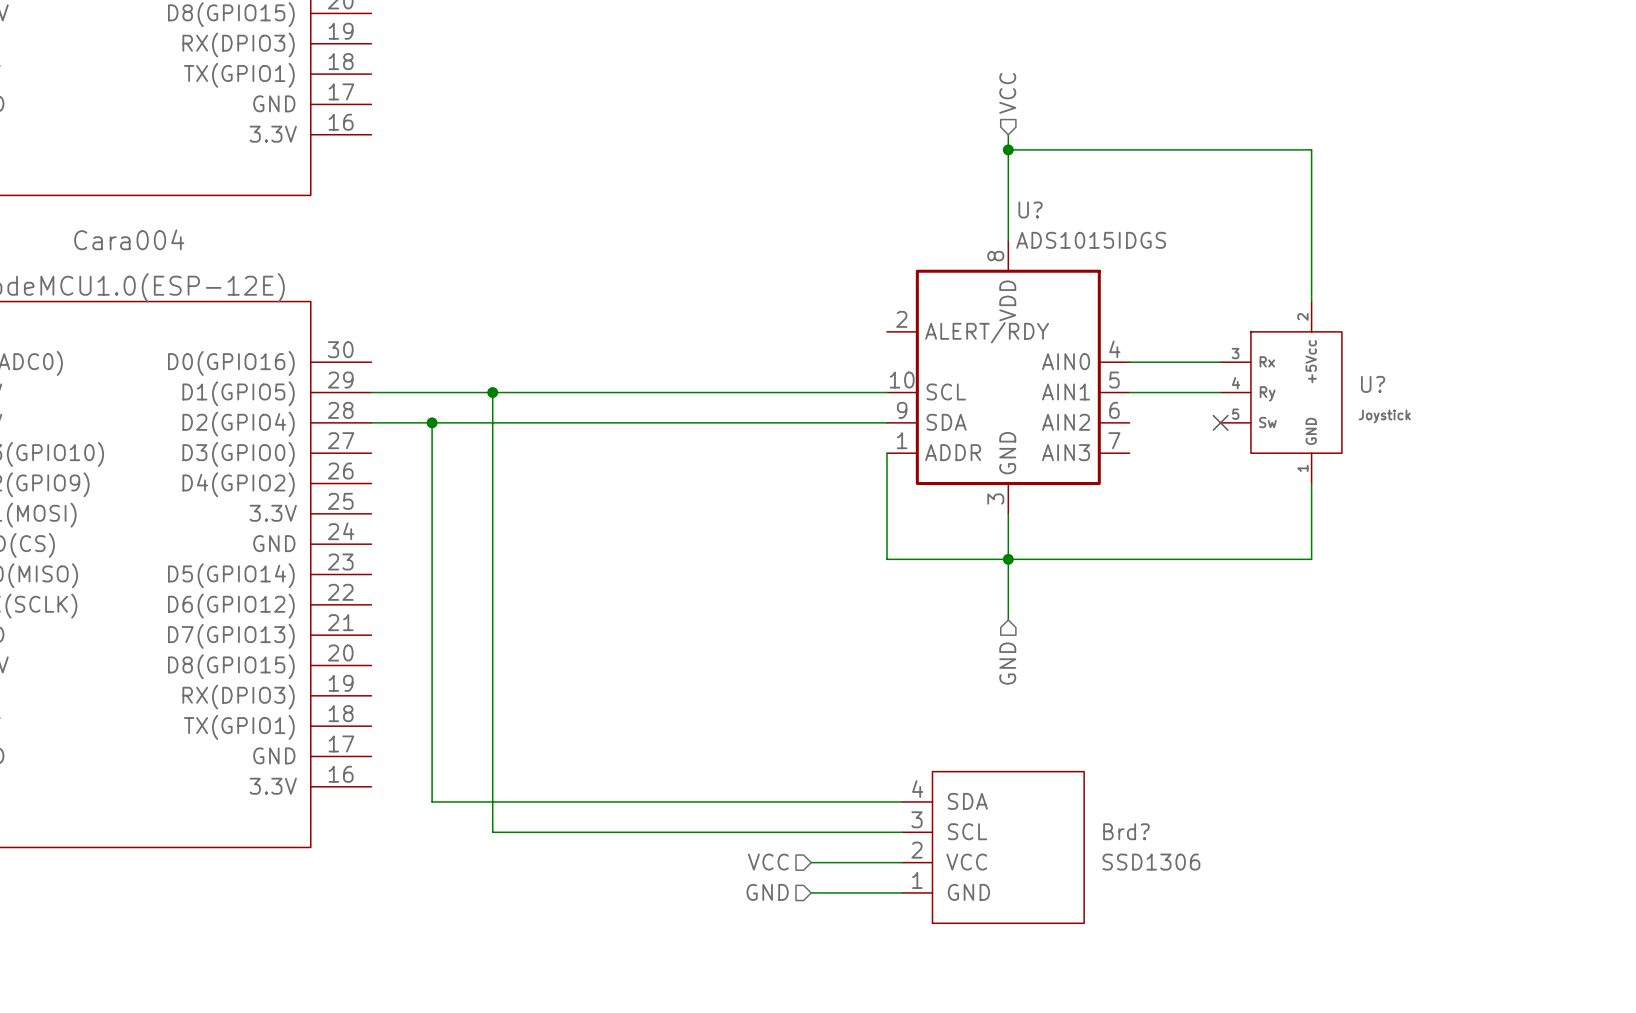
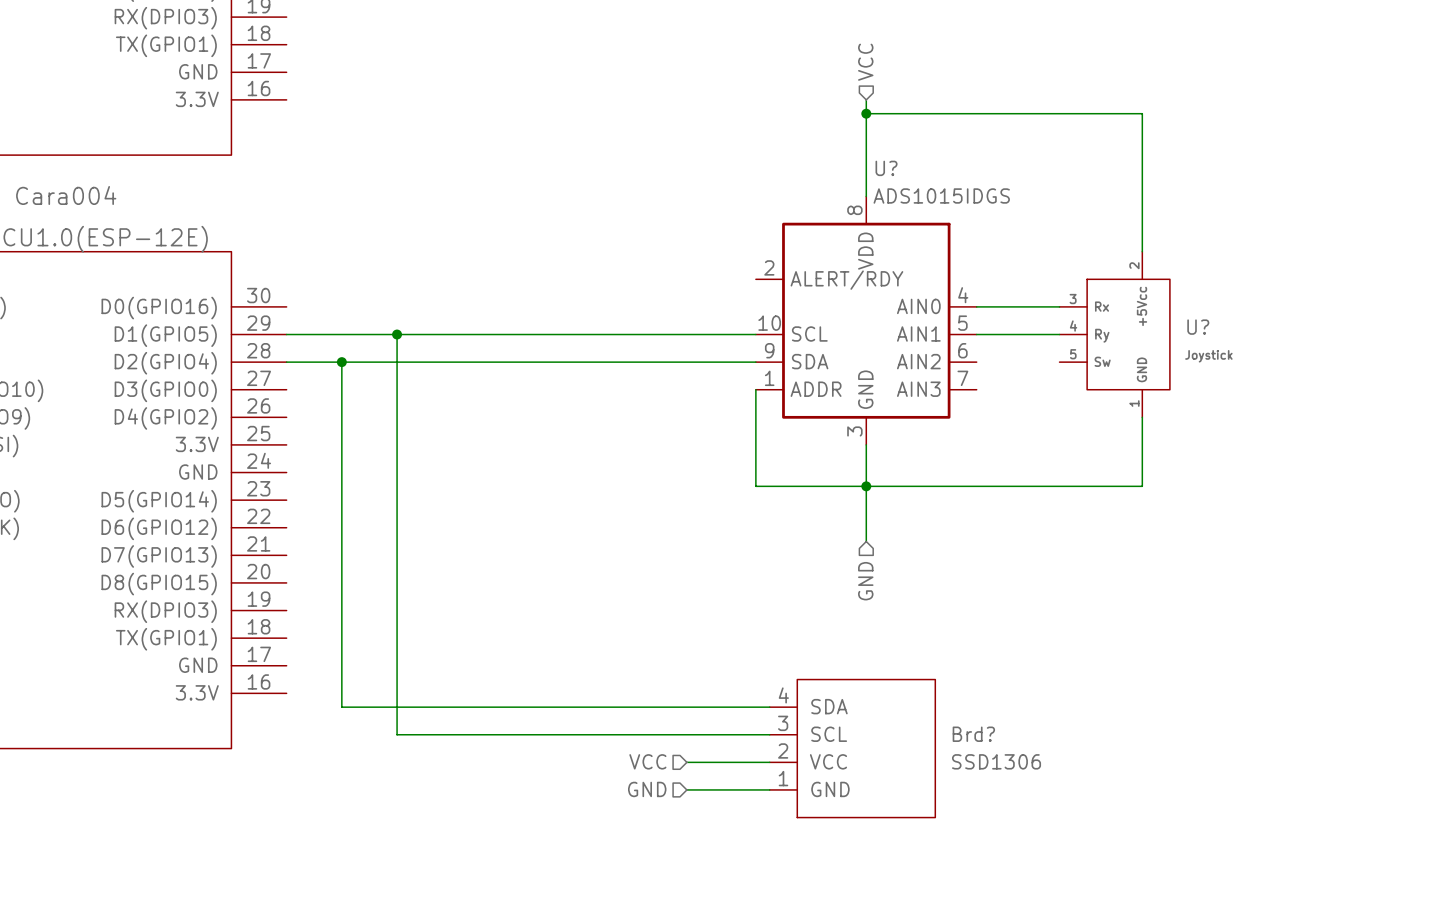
no-connect mark: (1220, 422) -> none

